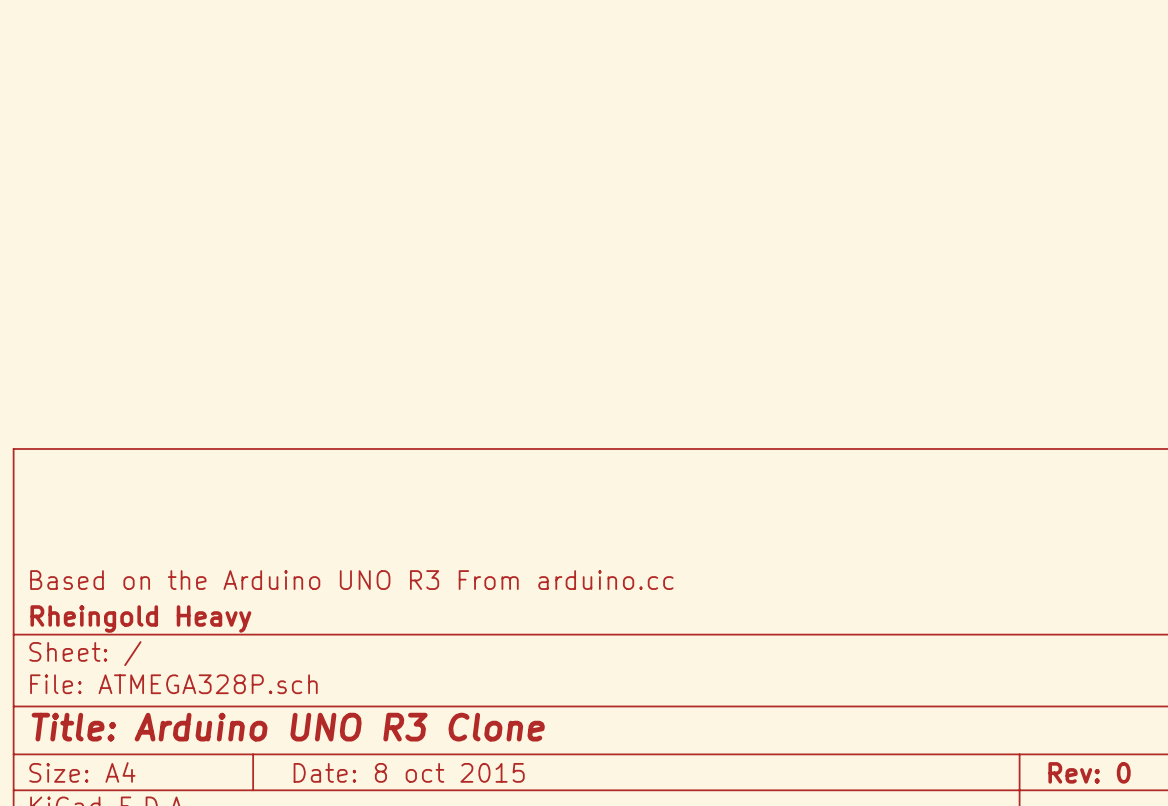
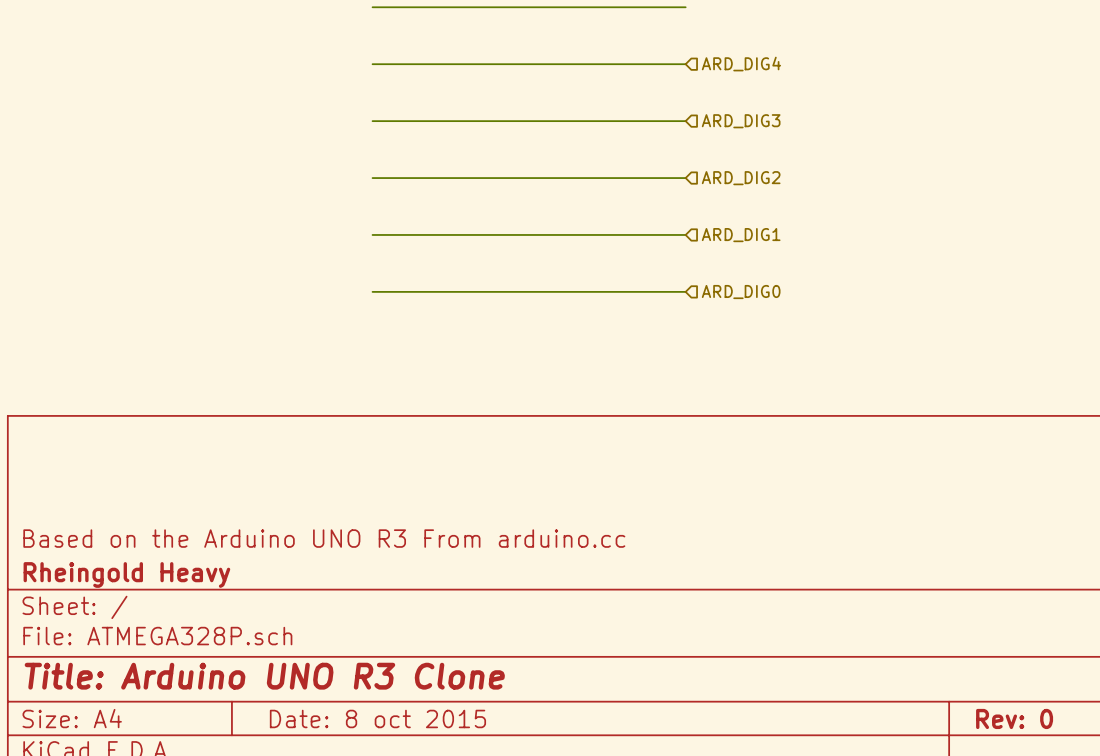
wire: none -> (372, 7) (685, 7)
hierarchical label: none -> ARD_DIG4 (741, 64)
wire: none -> (372, 64) (685, 64)
wire: none -> (372, 121) (685, 121)
hierarchical label: none -> ARD_DIG3 (741, 121)
wire: none -> (372, 178) (685, 178)
hierarchical label: none -> ARD_DIG2 (741, 178)
wire: none -> (372, 234) (685, 234)
hierarchical label: none -> ARD_DIG1 (741, 235)
wire: none -> (372, 291) (685, 291)
hierarchical label: none -> ARD_DIG0 (741, 292)

